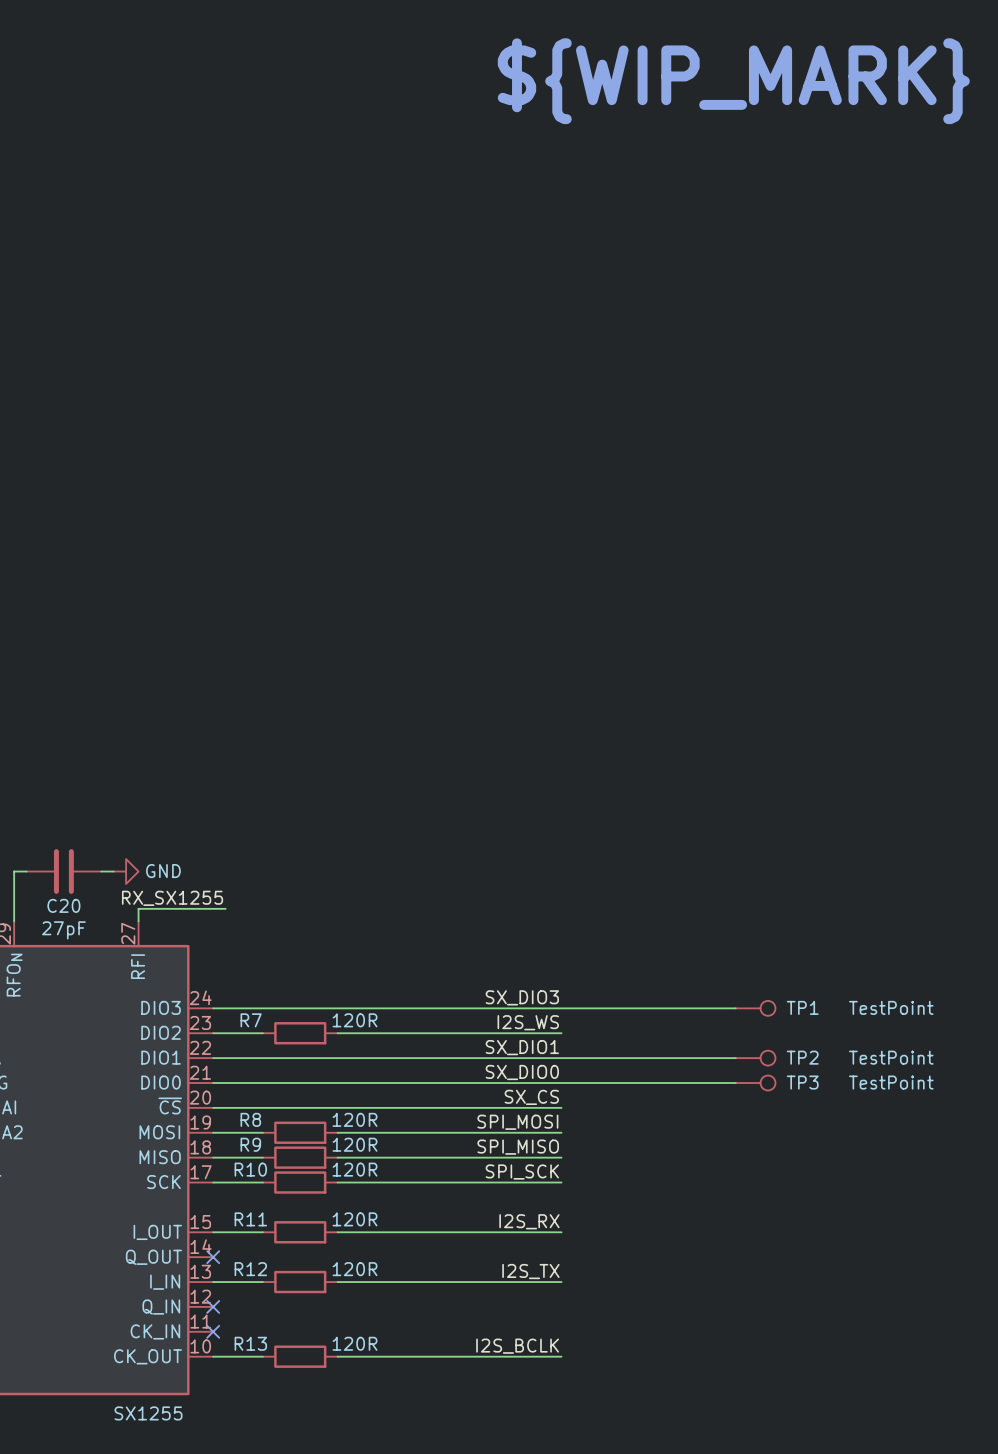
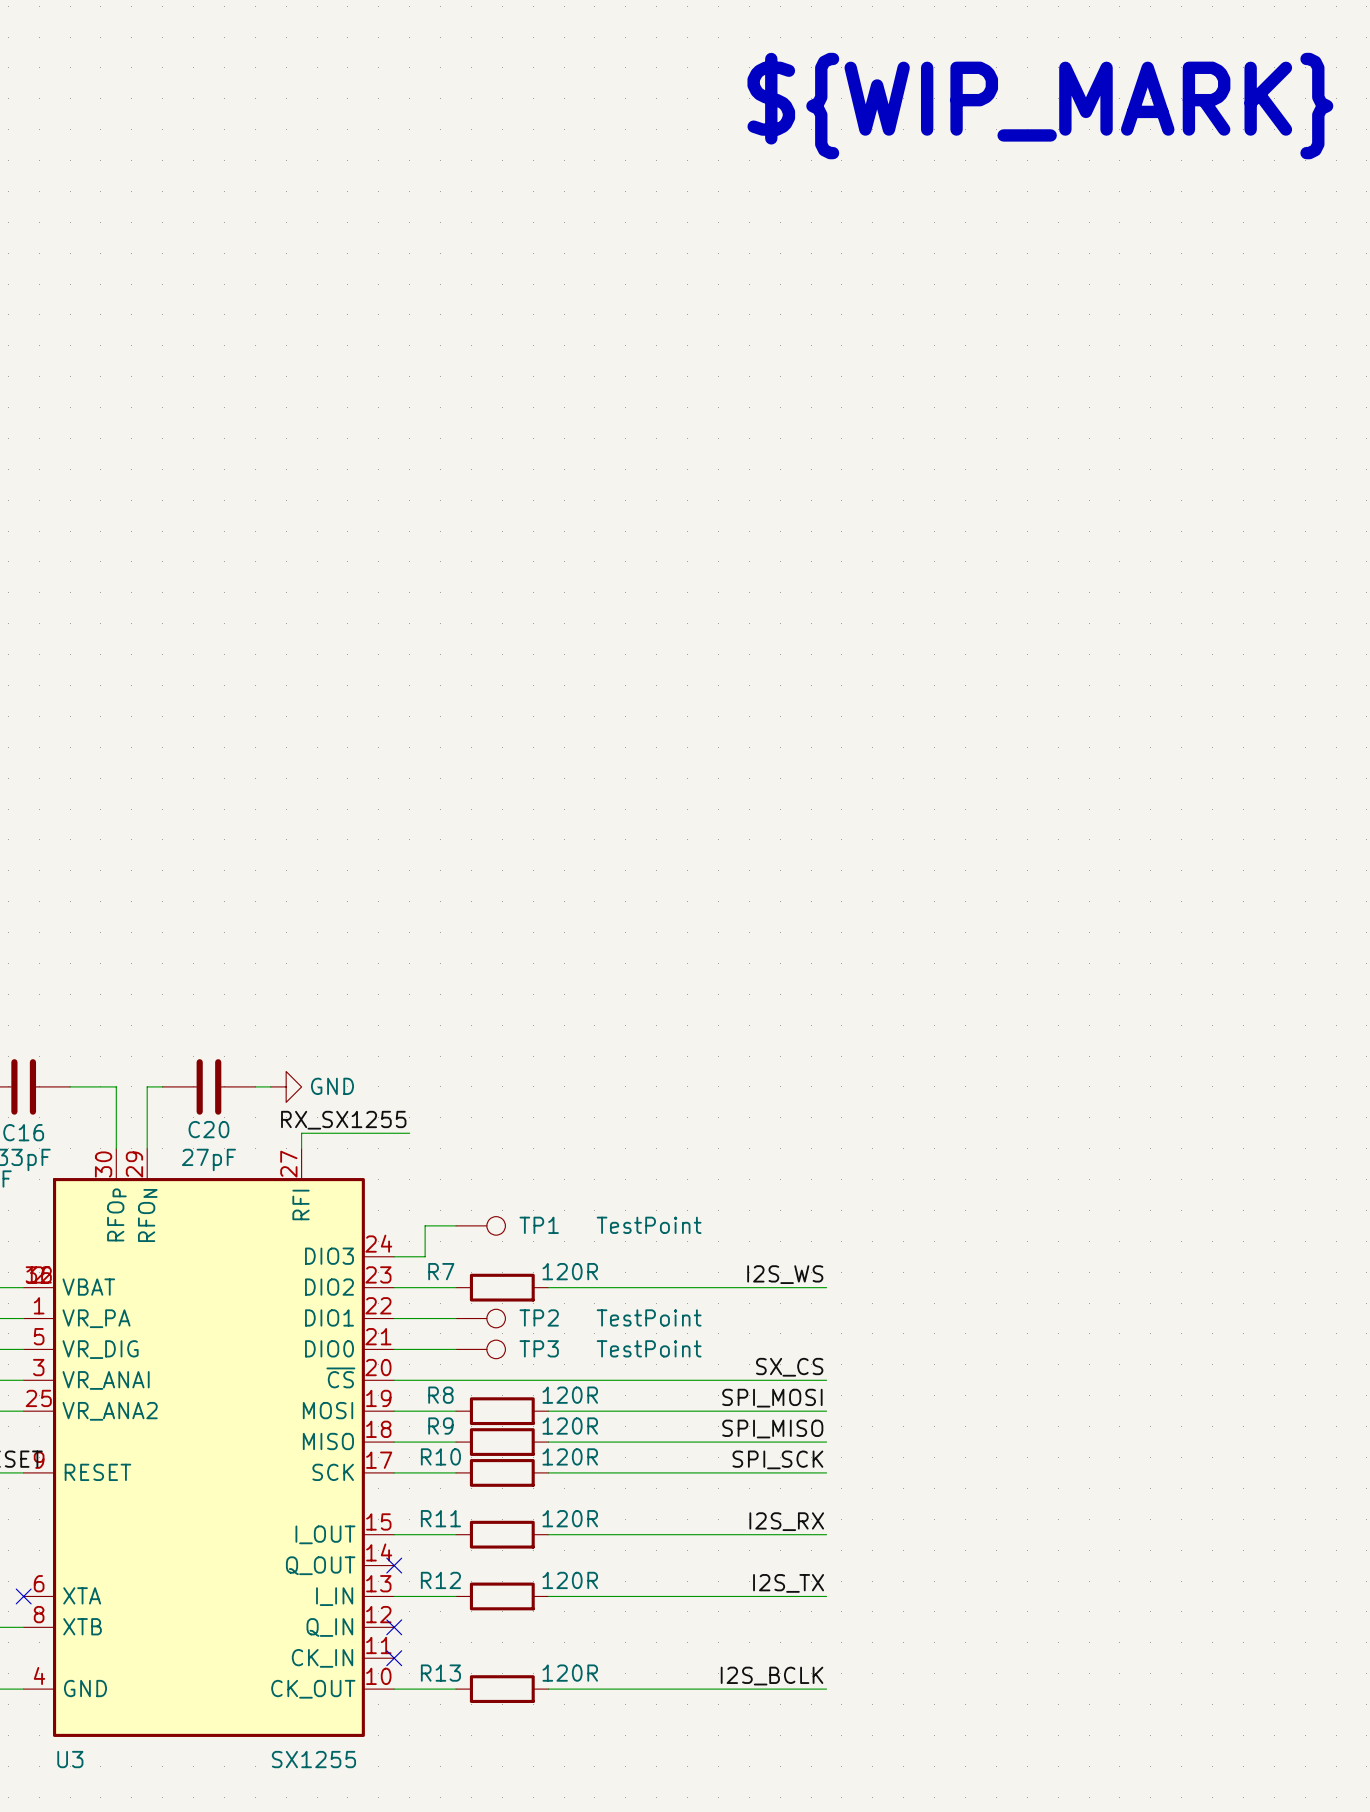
label: SX_DIO3 (522, 997) -> none
wire: (238, 1008) (735, 1008) -> (425, 1256) (425, 1225) (455, 1225)
TP1 position: (755, 1008) -> (480, 1225)
label: SX_DIO1 (522, 1047) -> none
wire: (262, 1058) (735, 1058) -> none
TP2 position: (755, 1058) -> (480, 1318)
label: SX_DIO0 (522, 1072) -> none
wire: (262, 1083) (735, 1083) -> none
TP3 position: (755, 1083) -> (480, 1349)

